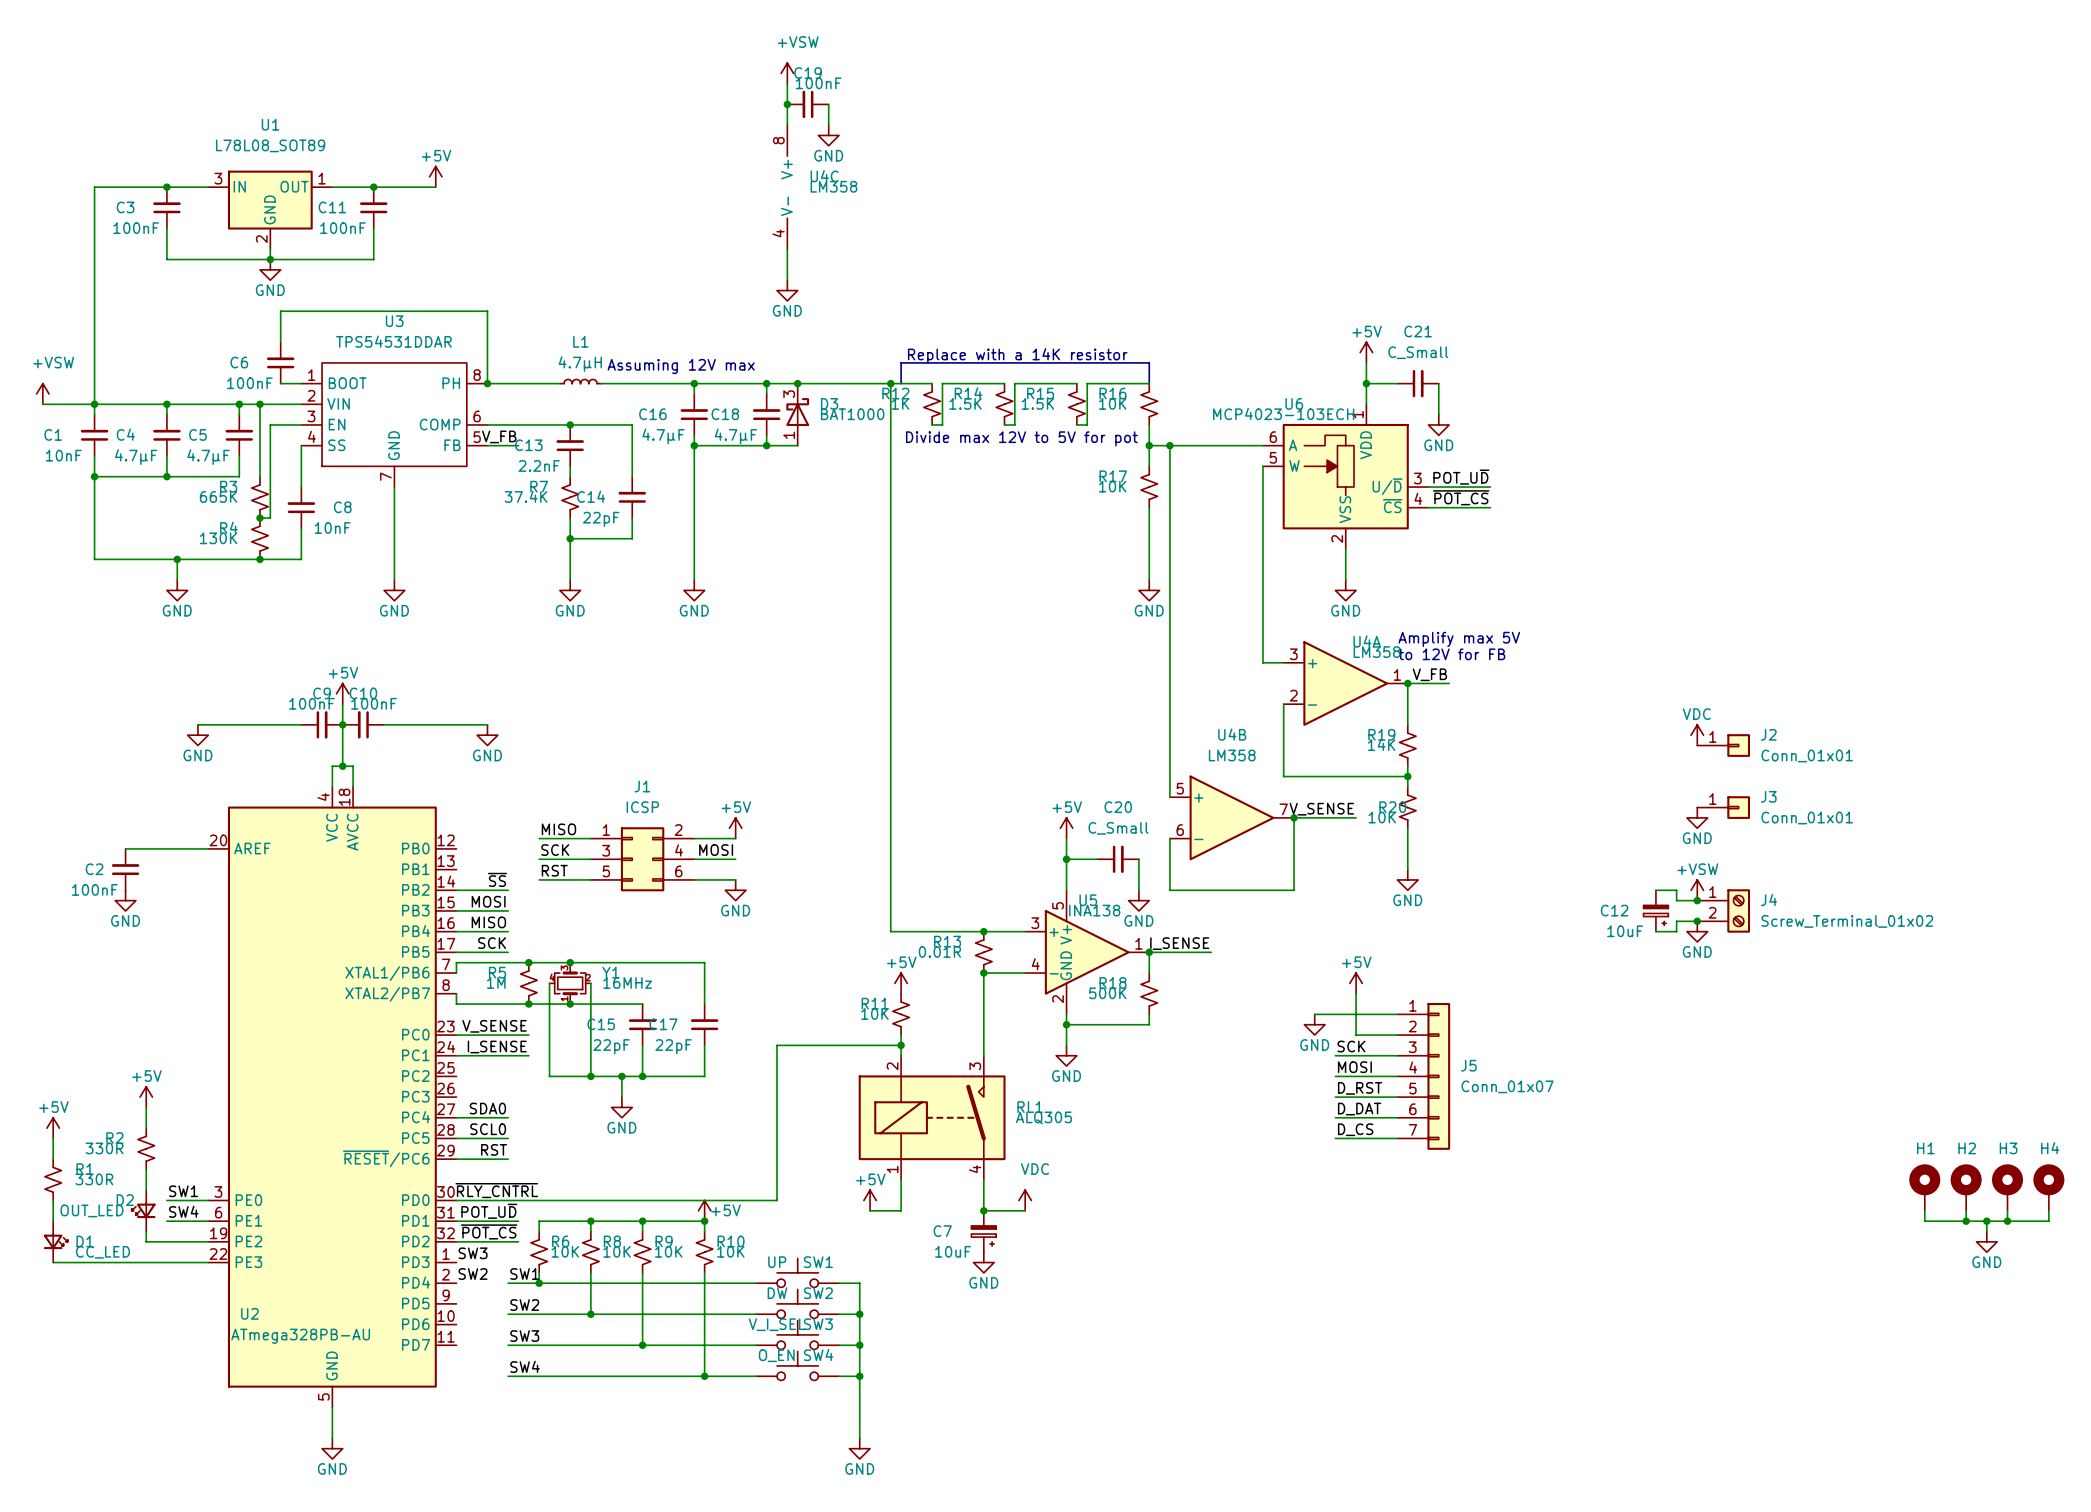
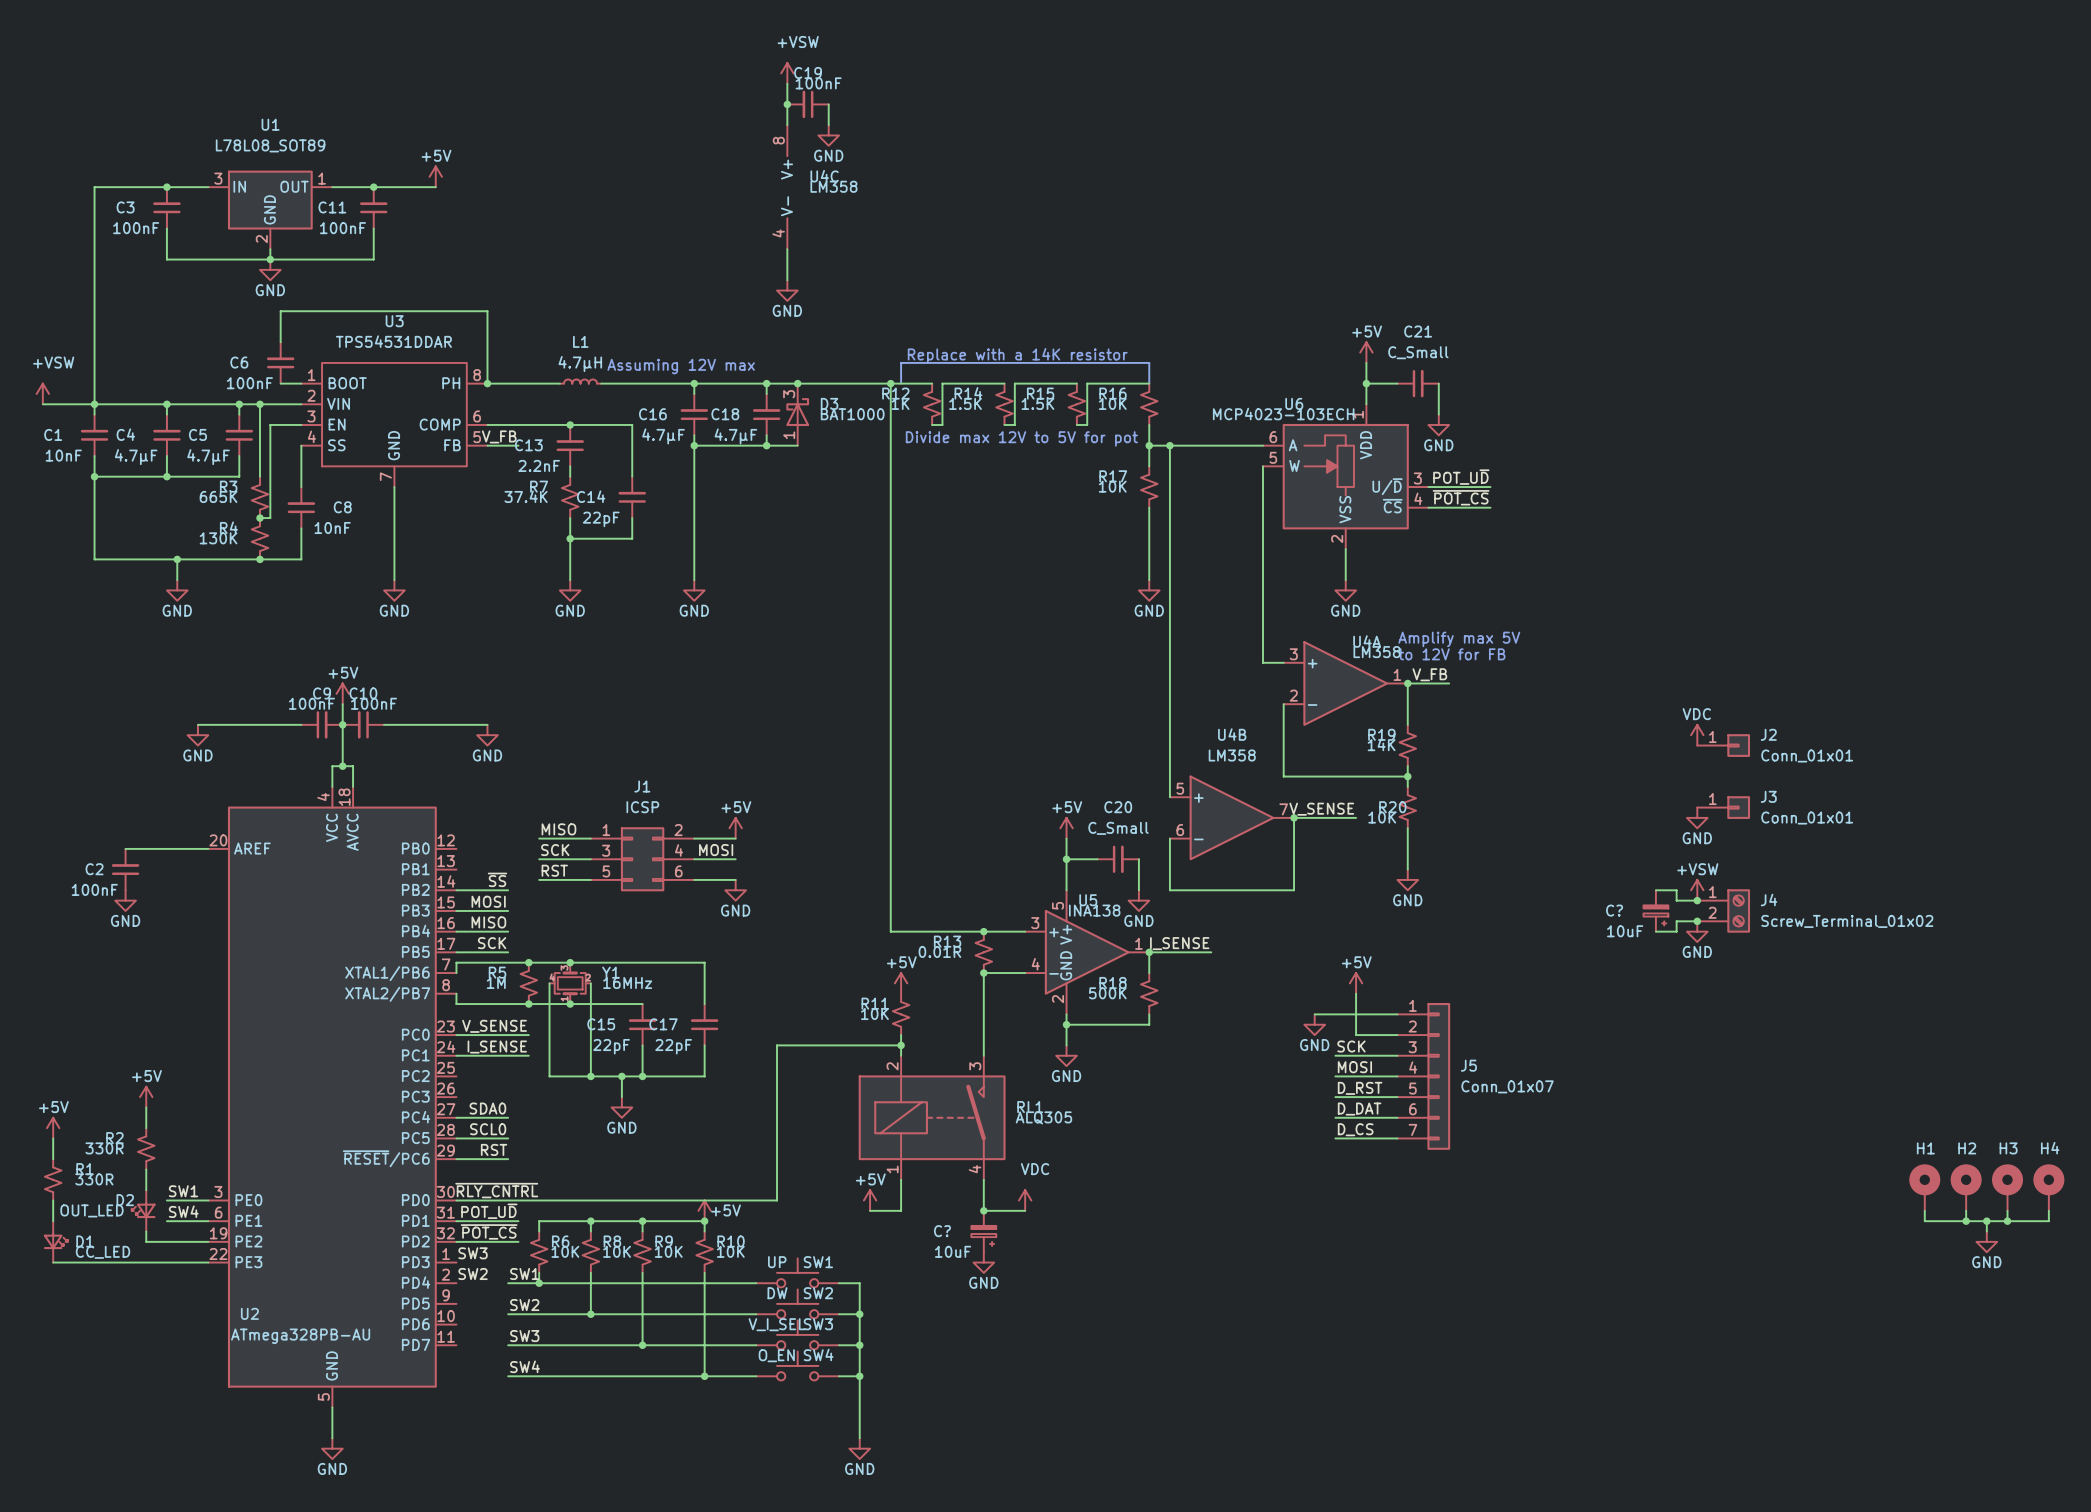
C12 name: C12 (1614, 910) -> C? (1614, 910)
C7 name: C7 (942, 1231) -> C? (942, 1231)

